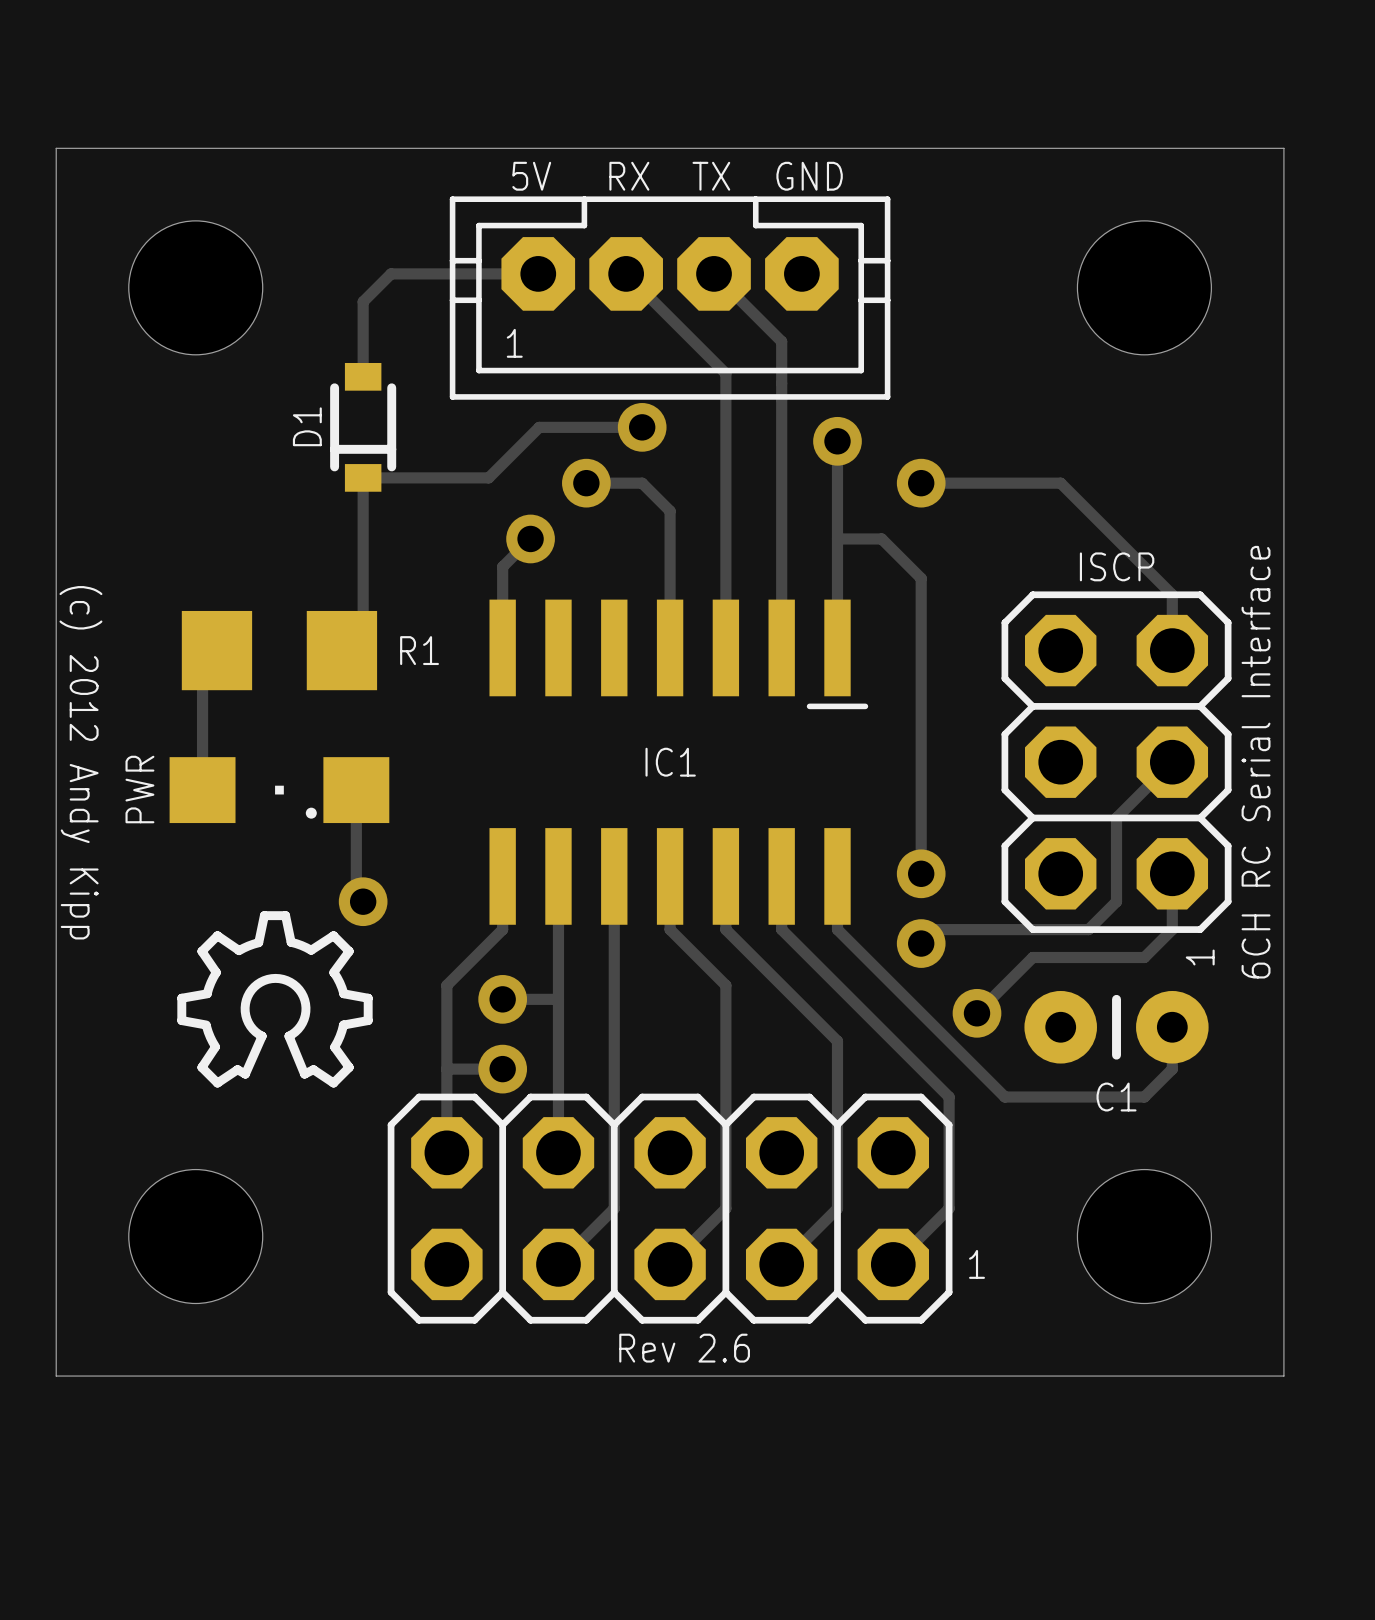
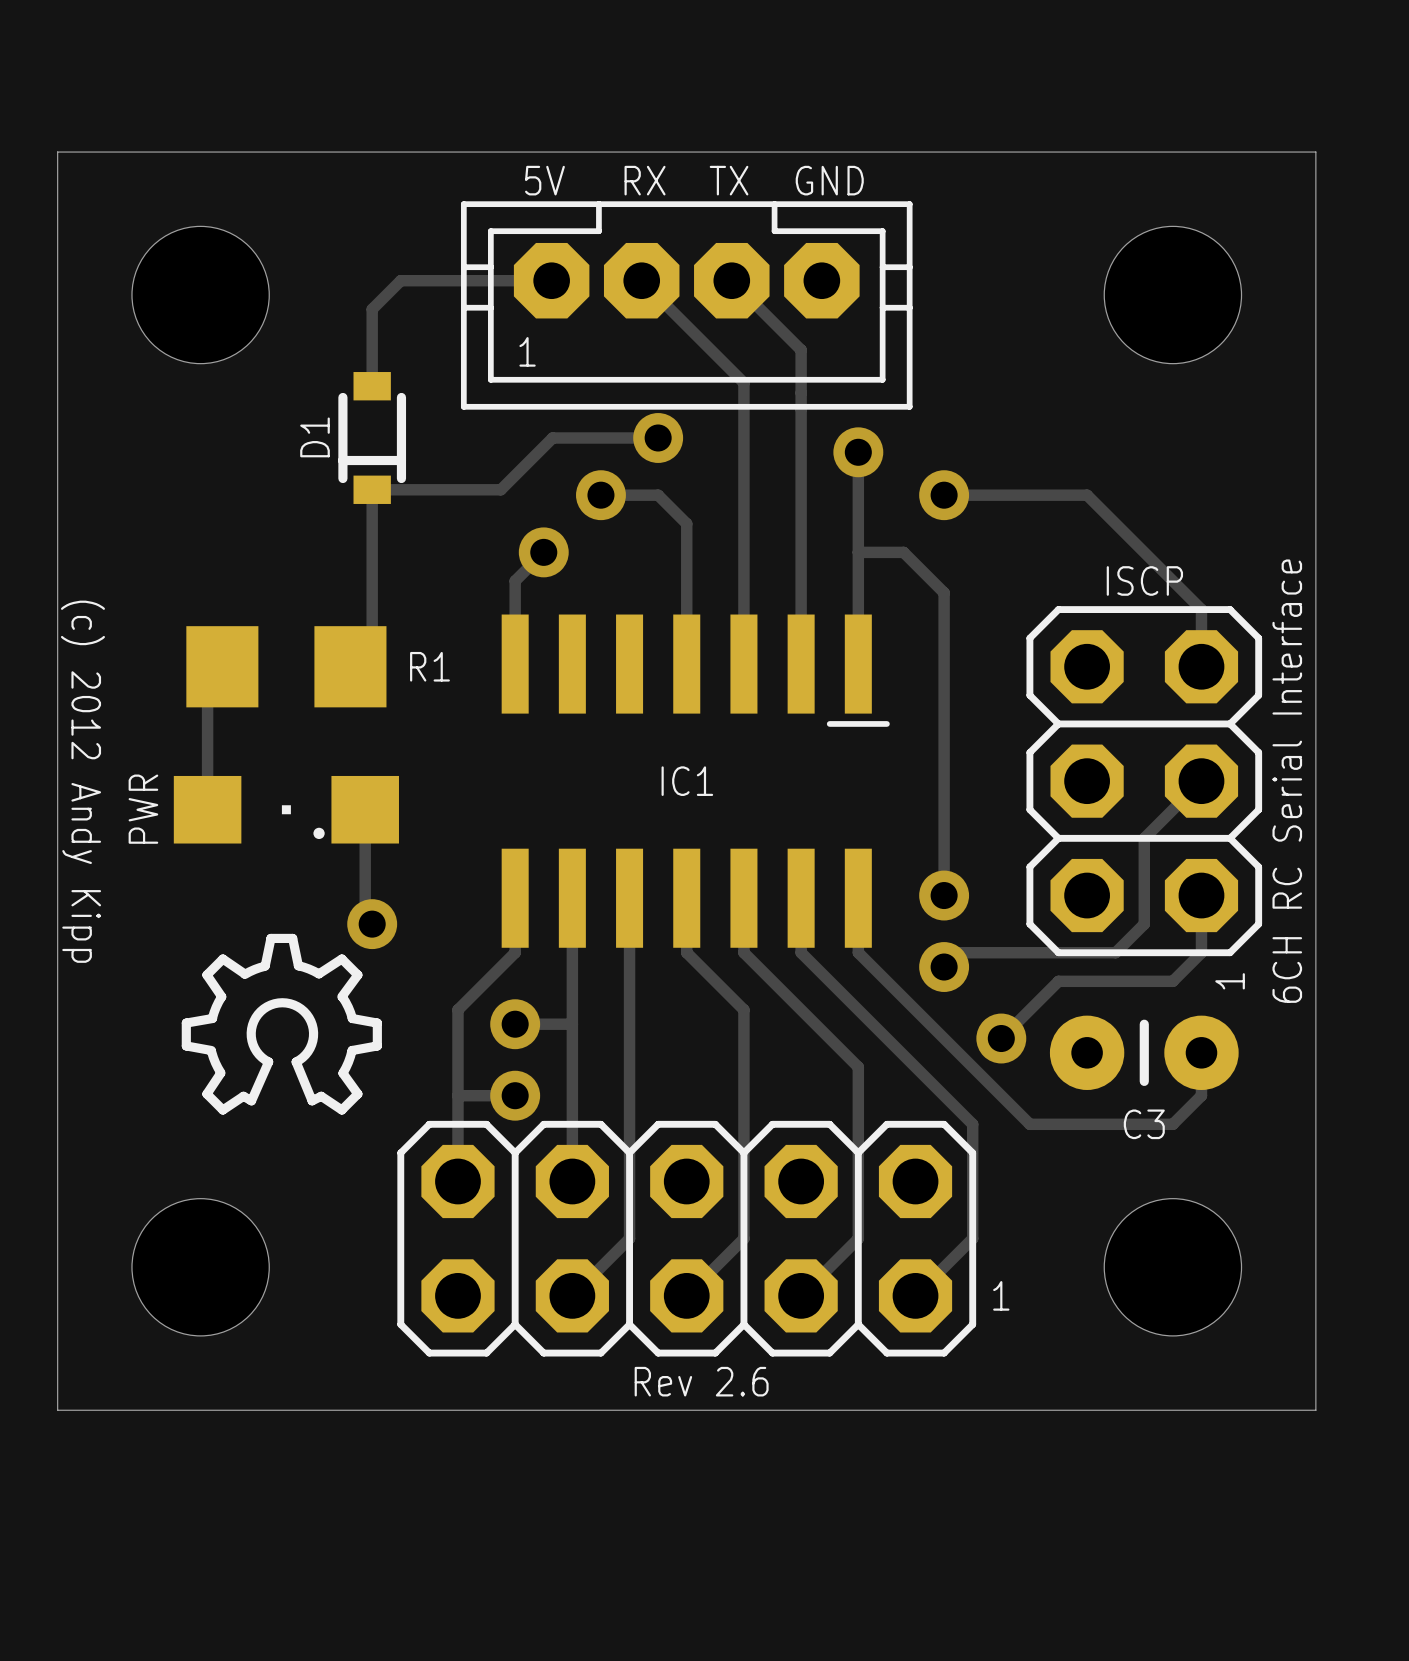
C1 name: C1 (1116, 1097) -> C3 (1144, 1124)

